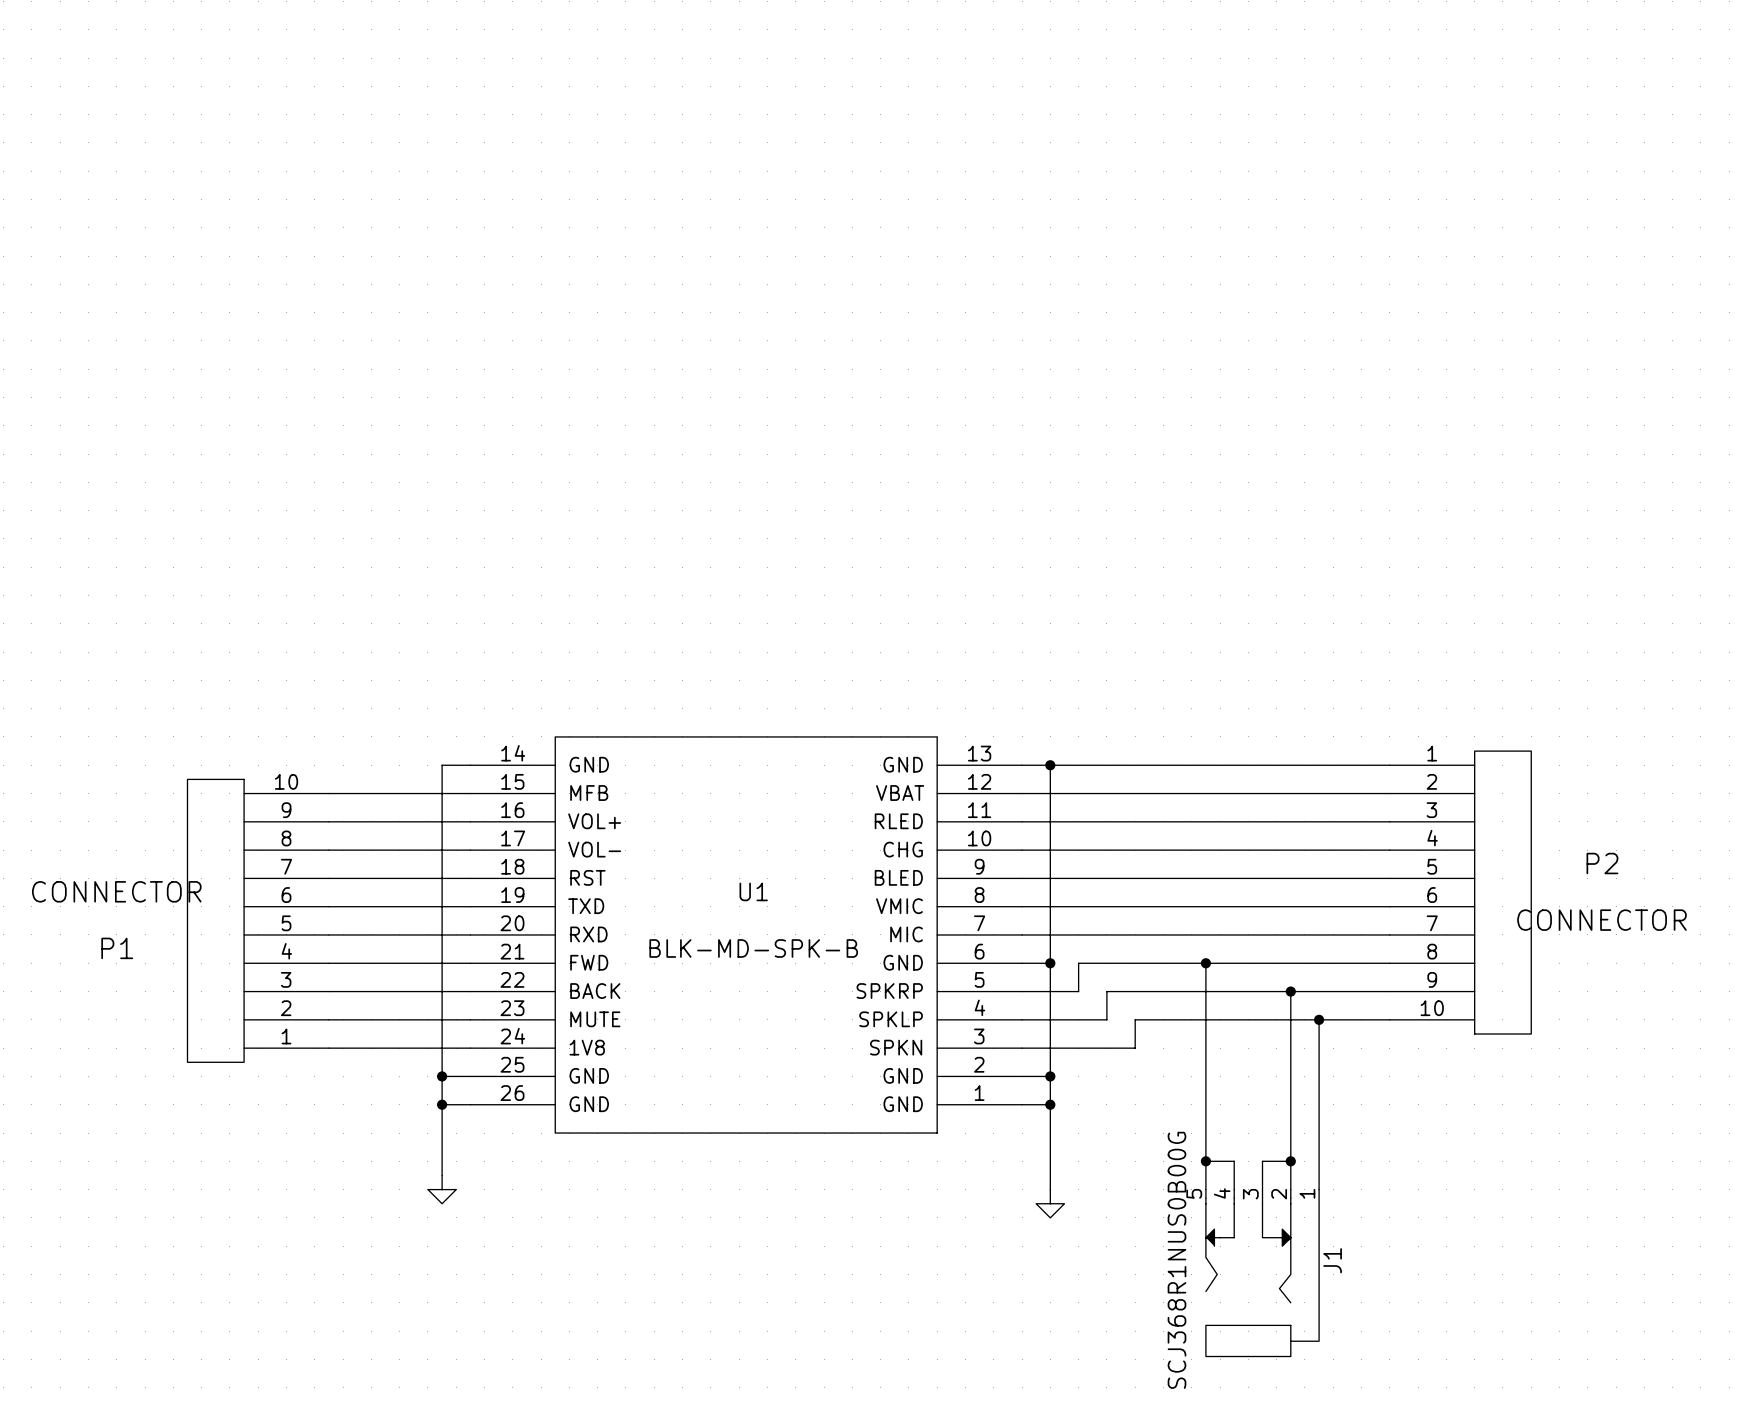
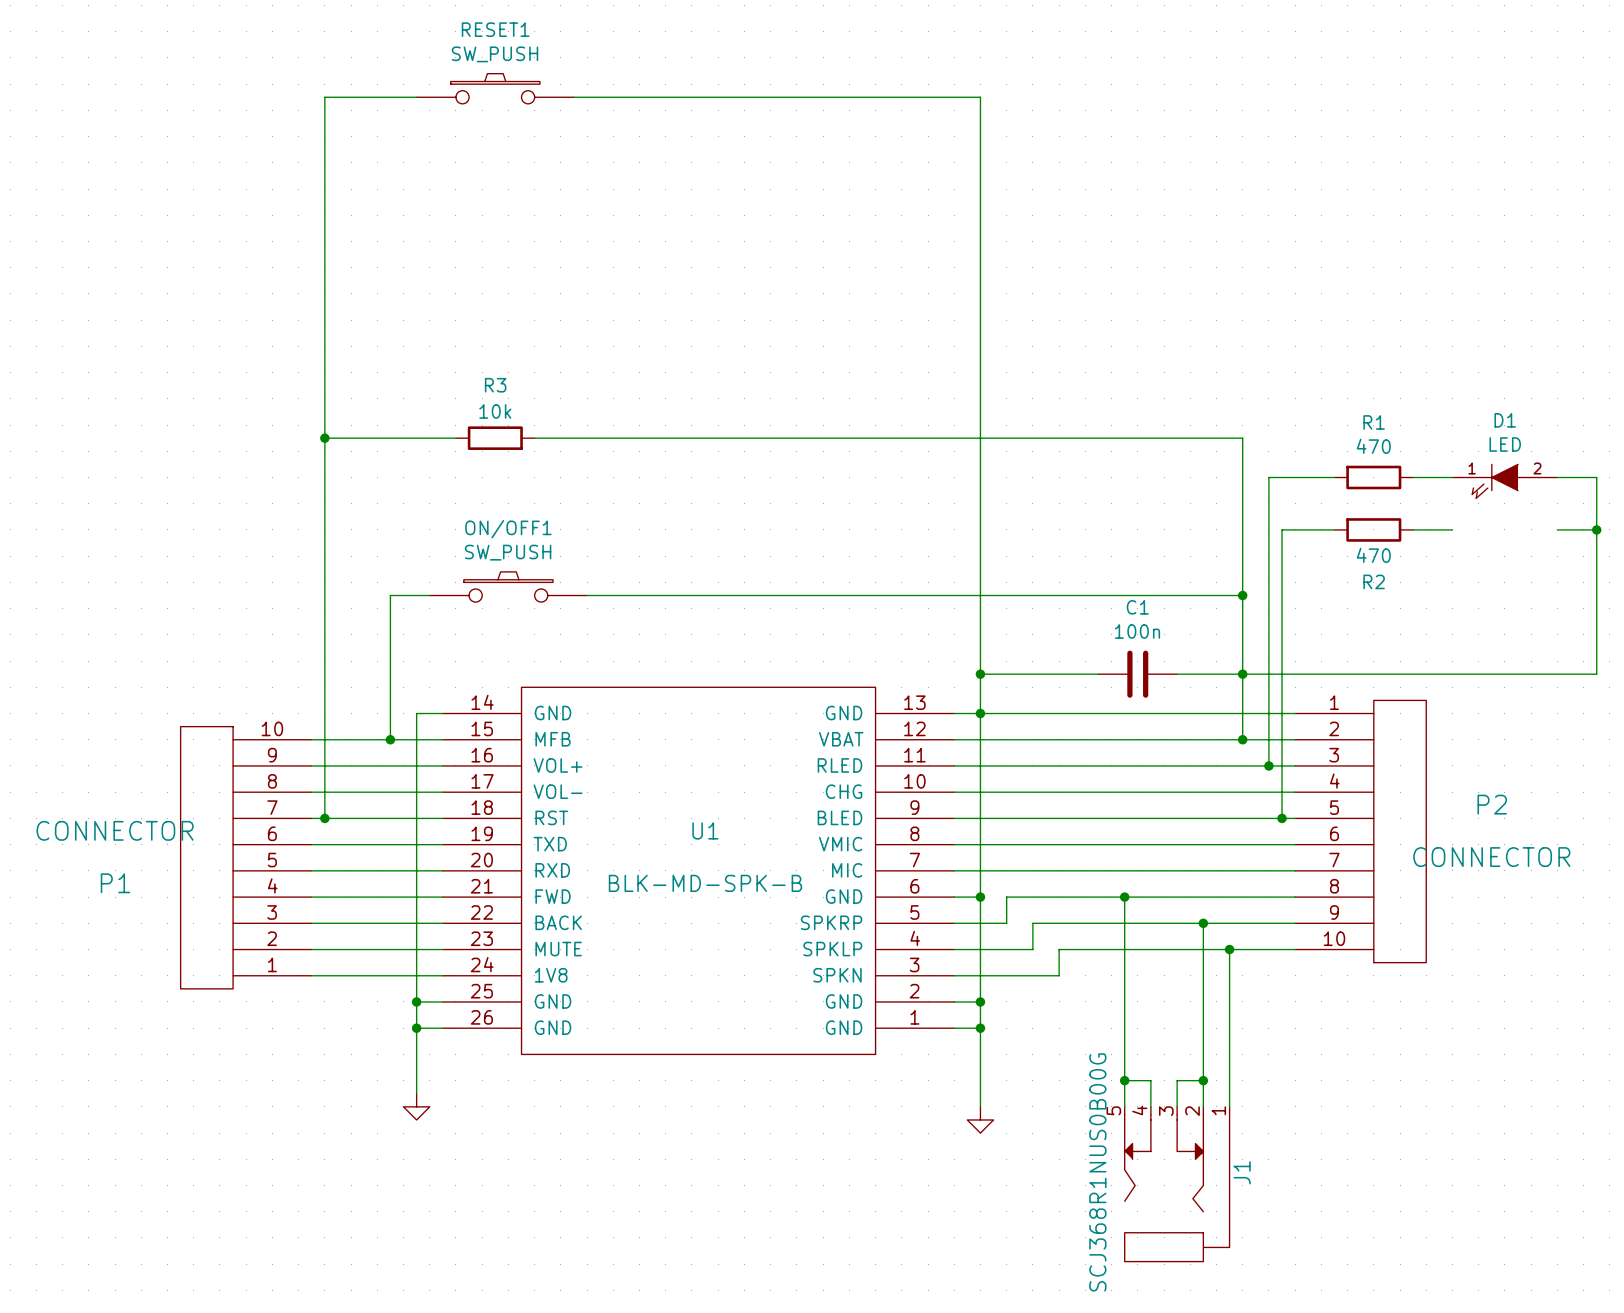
RESET1: none -> SW_PUSH (495, 88)
wire: none -> (416, 97) (324, 97) (324, 818)
wire: none -> (573, 97) (980, 97) (980, 713)
wire: none -> (324, 438) (455, 438)
junction: none -> (324, 438)
R3: none -> 10k (495, 438)
wire: none -> (534, 438) (1242, 438) (1242, 739)
wire: none -> (1334, 477) (1268, 477) (1268, 765)
R1: none -> 470 (1373, 477)
wire: none -> (1413, 477) (1452, 477)
wire: none -> (1557, 477) (1596, 477) (1596, 674) (1177, 674)
D1: none -> LED (1504, 481)
wire: none -> (1334, 529) (1282, 529) (1282, 818)
R2: none -> 470 (1373, 529)
wire: none -> (1413, 529) (1452, 529)
wire: none -> (1557, 529) (1596, 529)
junction: none -> (1596, 529)
ON/OFF1: none -> SW_PUSH (508, 586)
wire: none -> (429, 595) (390, 595) (390, 739)
wire: none -> (587, 595) (1242, 595)
junction: none -> (1242, 595)
wire: none -> (980, 674) (1098, 674)
junction: none -> (980, 674)
C1: none -> 100n (1137, 674)
junction: none -> (1242, 674)
junction: none -> (390, 739)
junction: none -> (1242, 739)
junction: none -> (1268, 765)
junction: none -> (324, 818)
junction: none -> (1282, 818)

